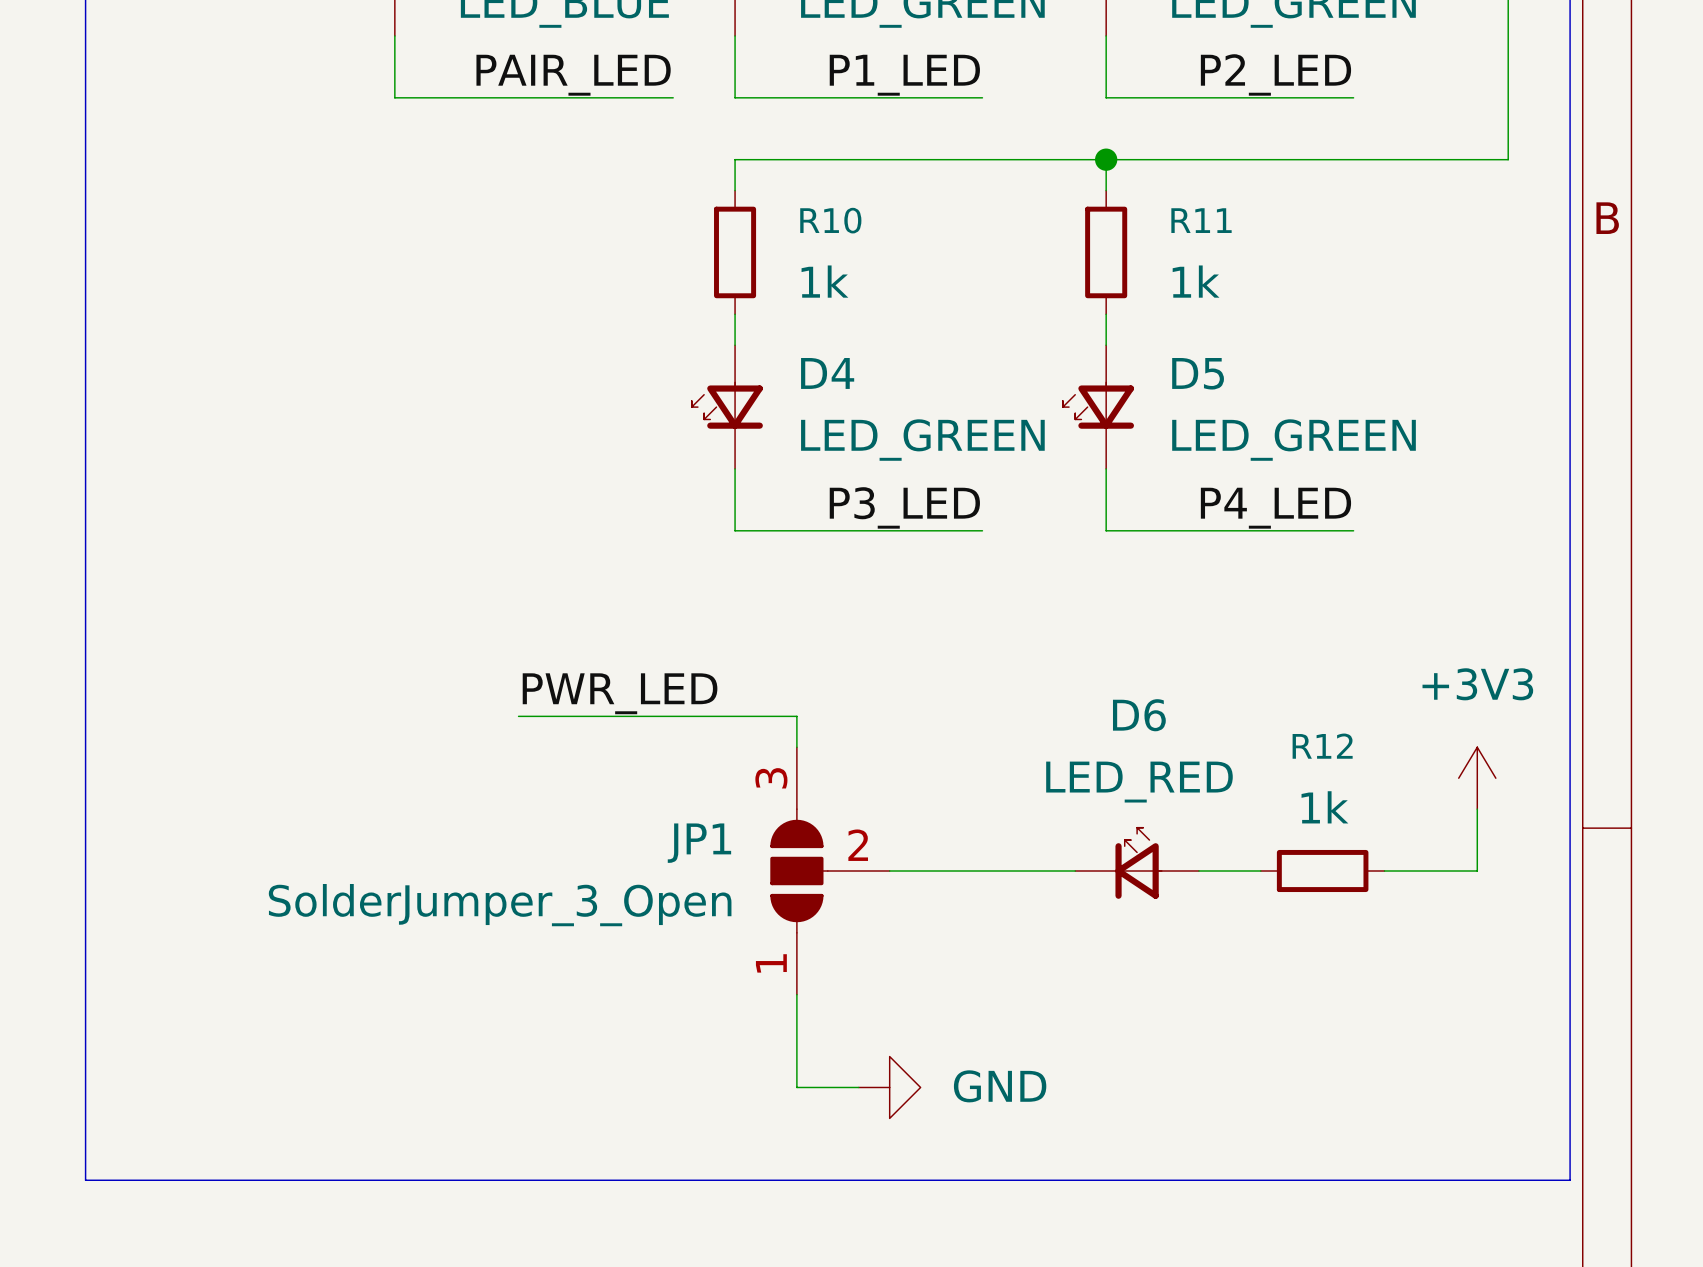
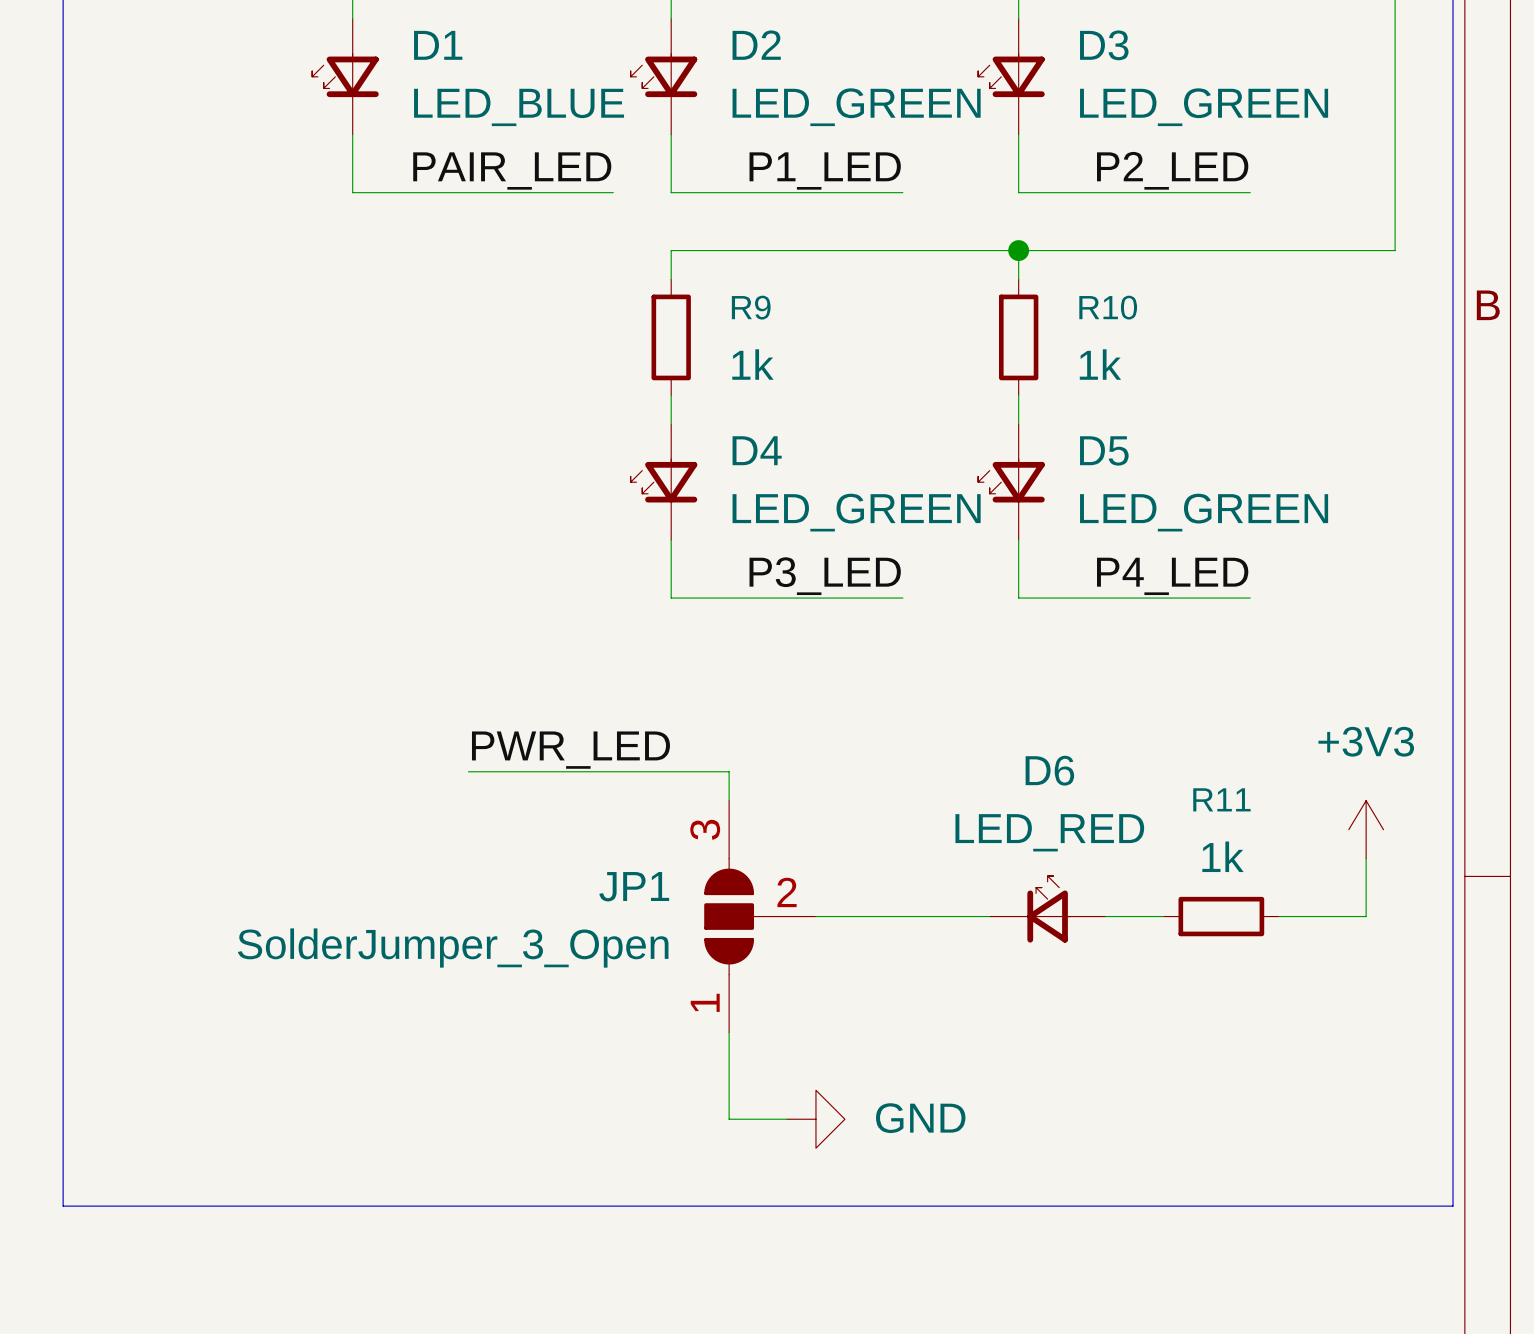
R10 name: R10 (830, 220) -> R9 (751, 307)
R11 name: R11 (1201, 220) -> R10 (1108, 307)
R12 name: R12 (1322, 746) -> R11 (1221, 799)

